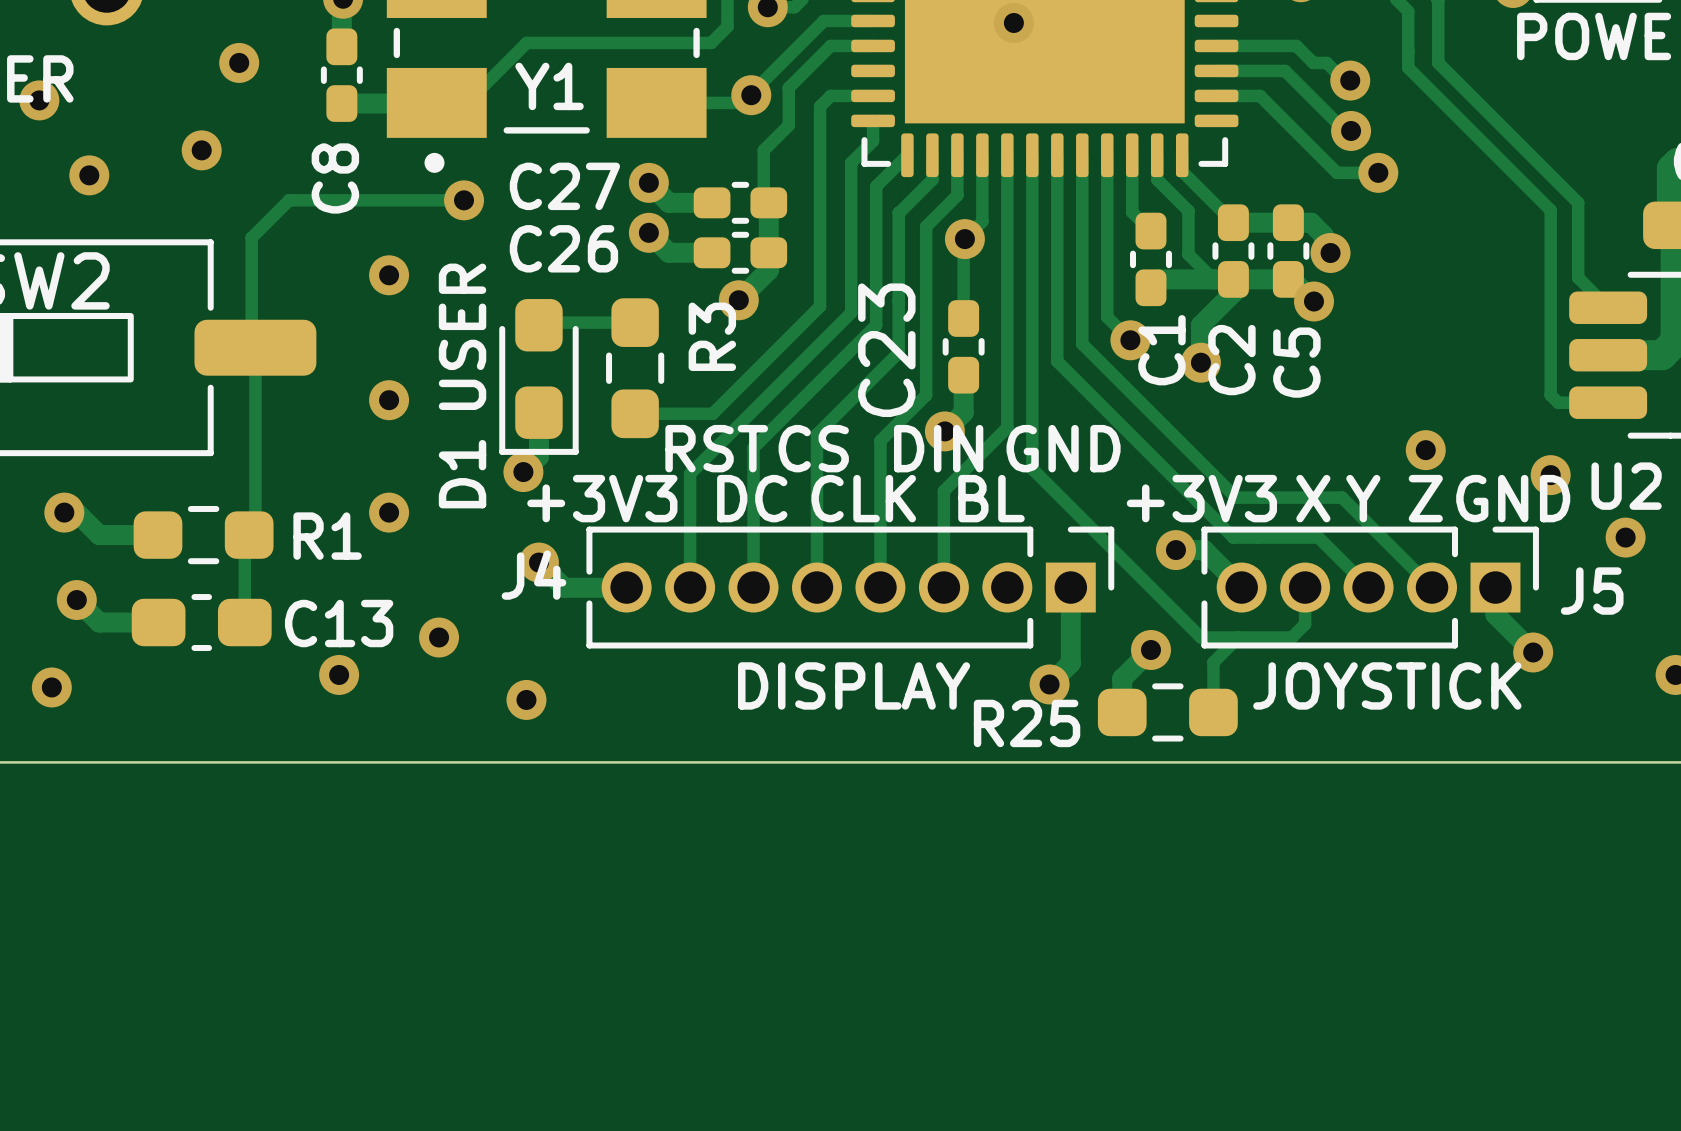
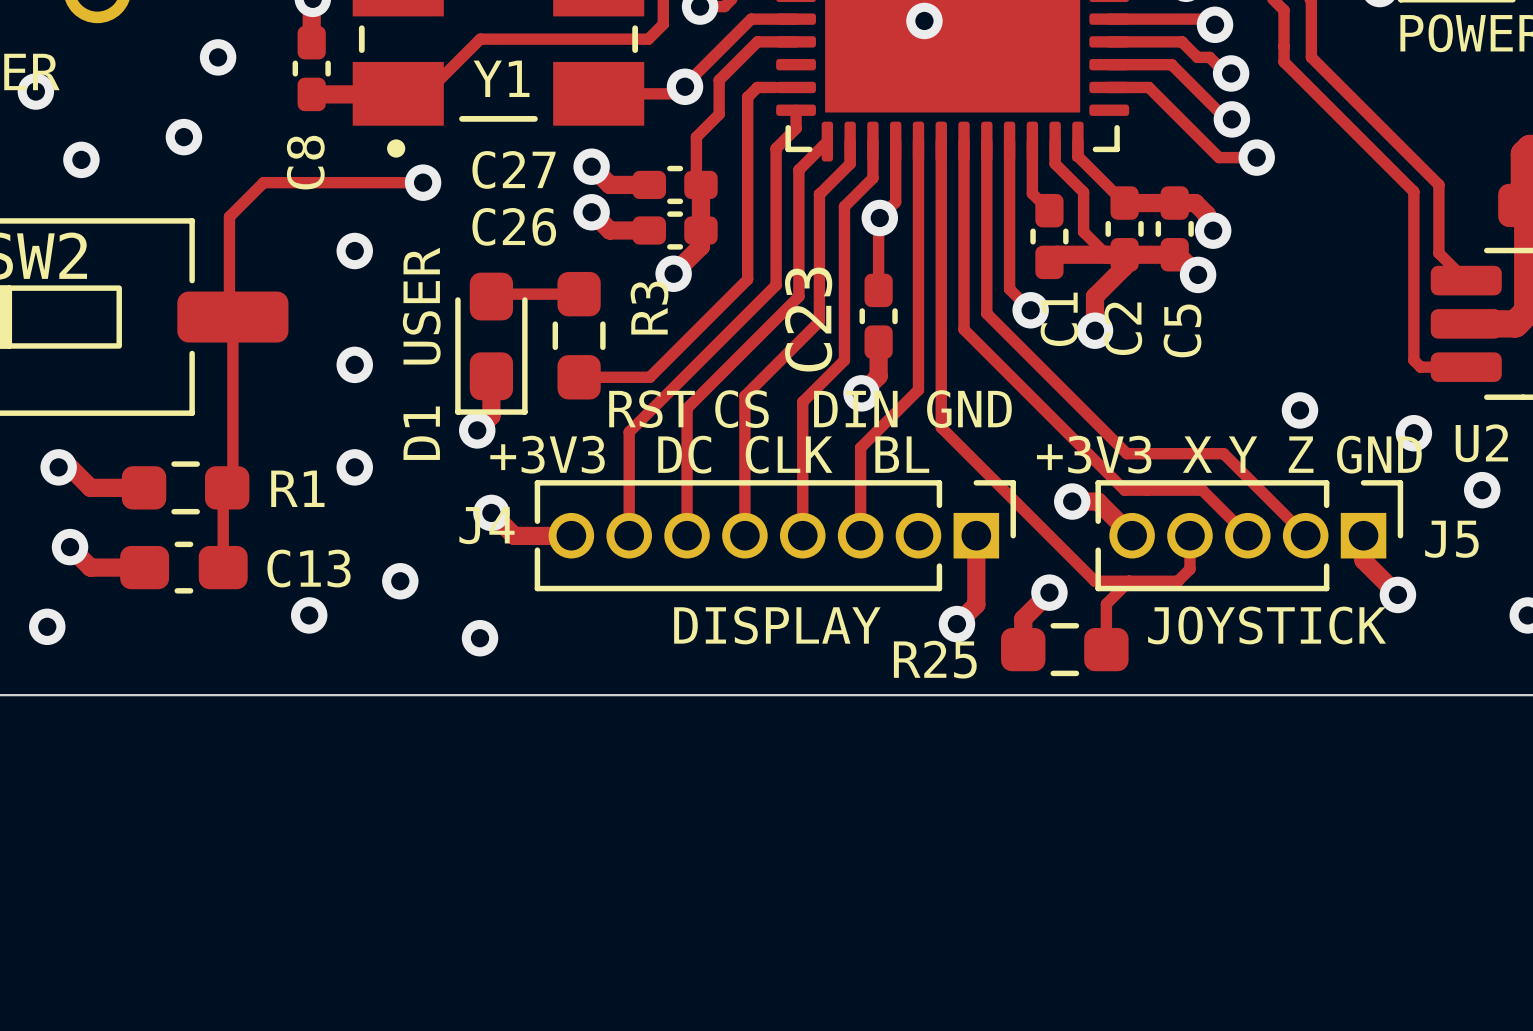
track: none -> (1109, 19) (1205, 19) (1211, 24) (1215, 24)
via: none -> (1215, 24)

